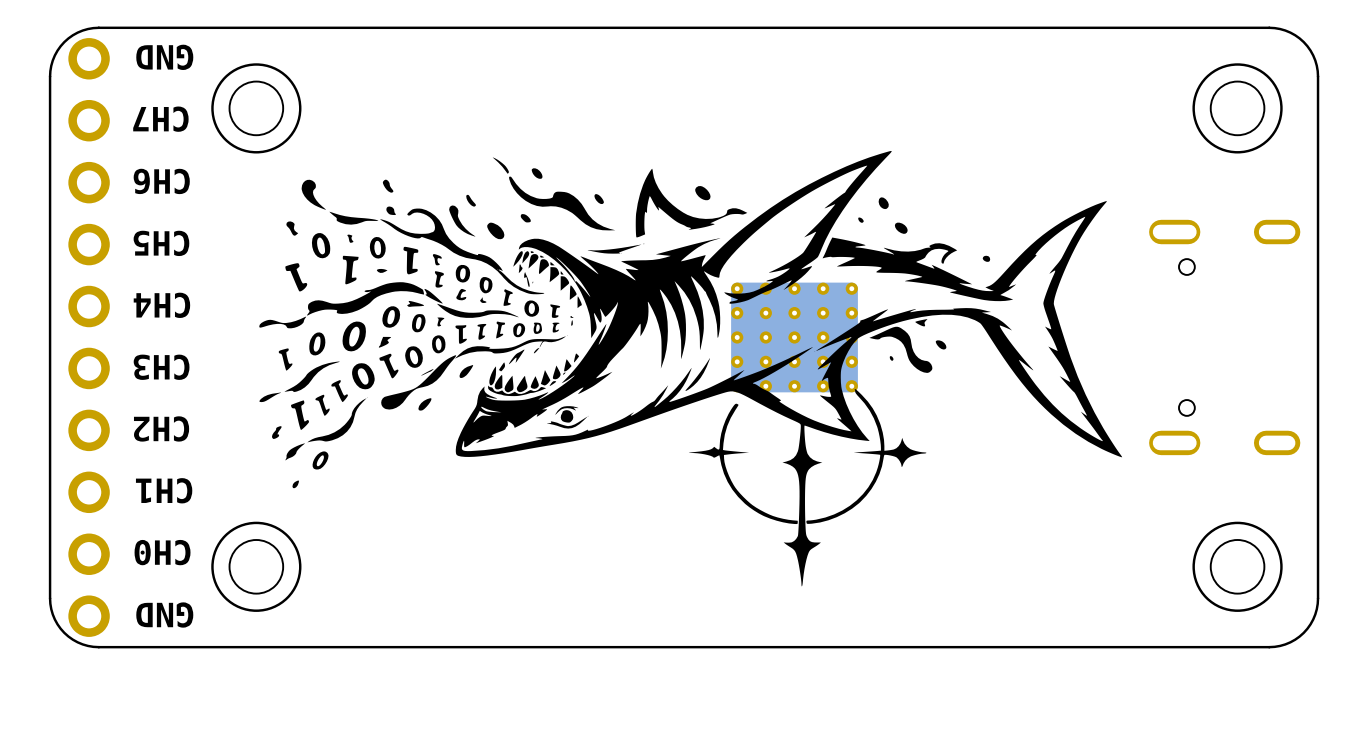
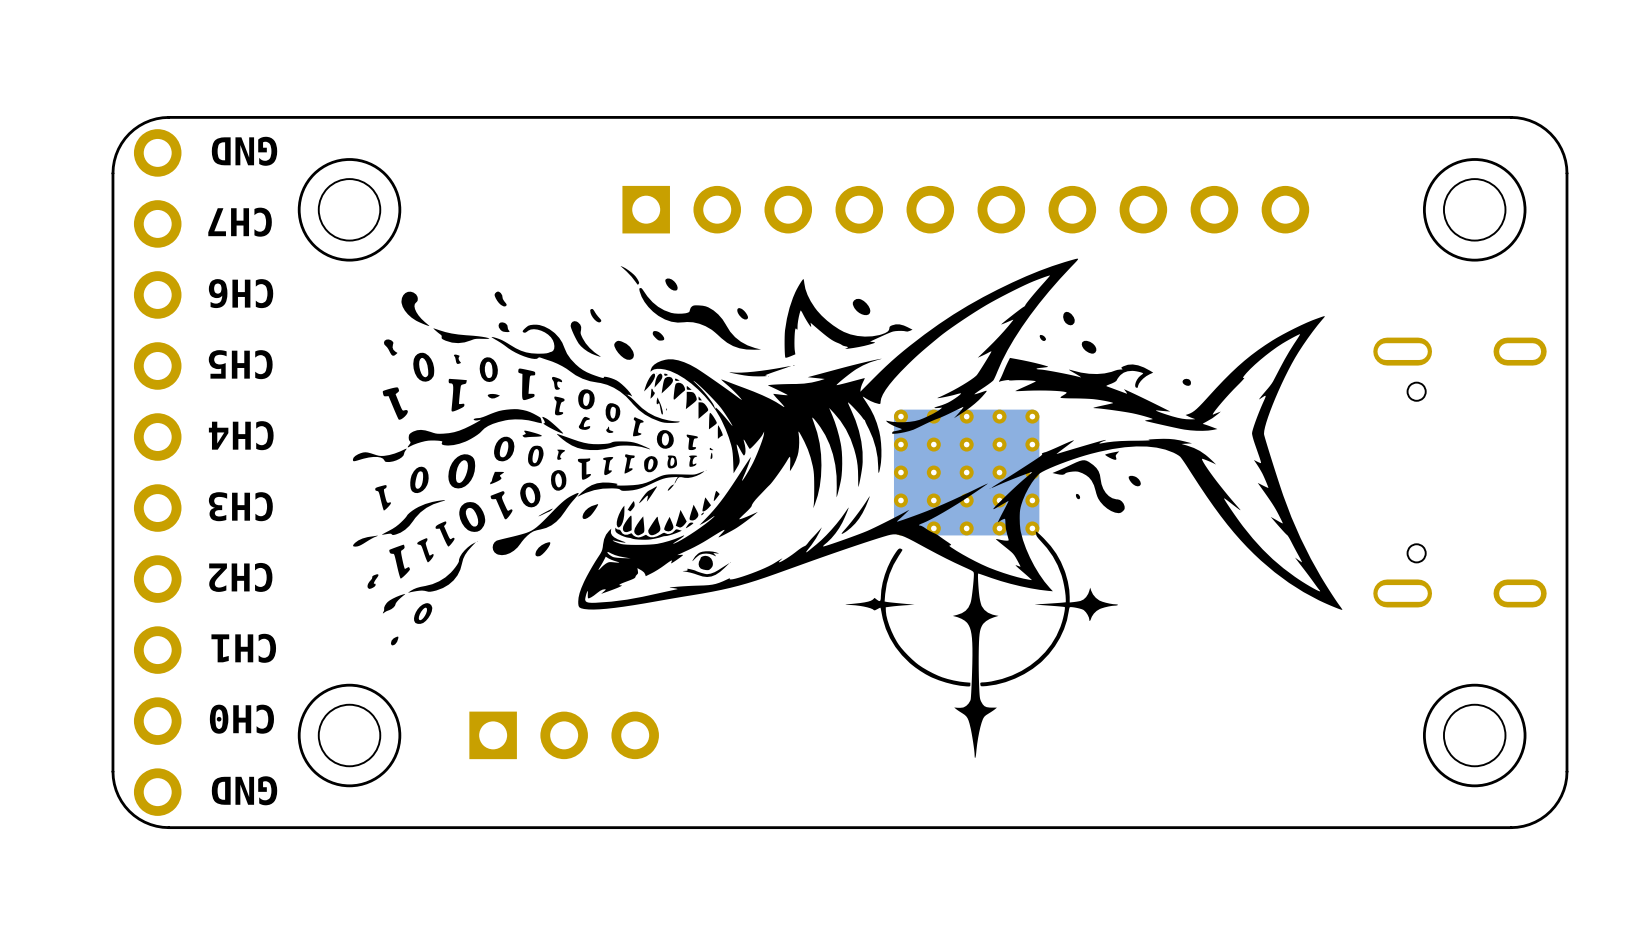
part: none -> (965, 209)
part: none -> (564, 735)

